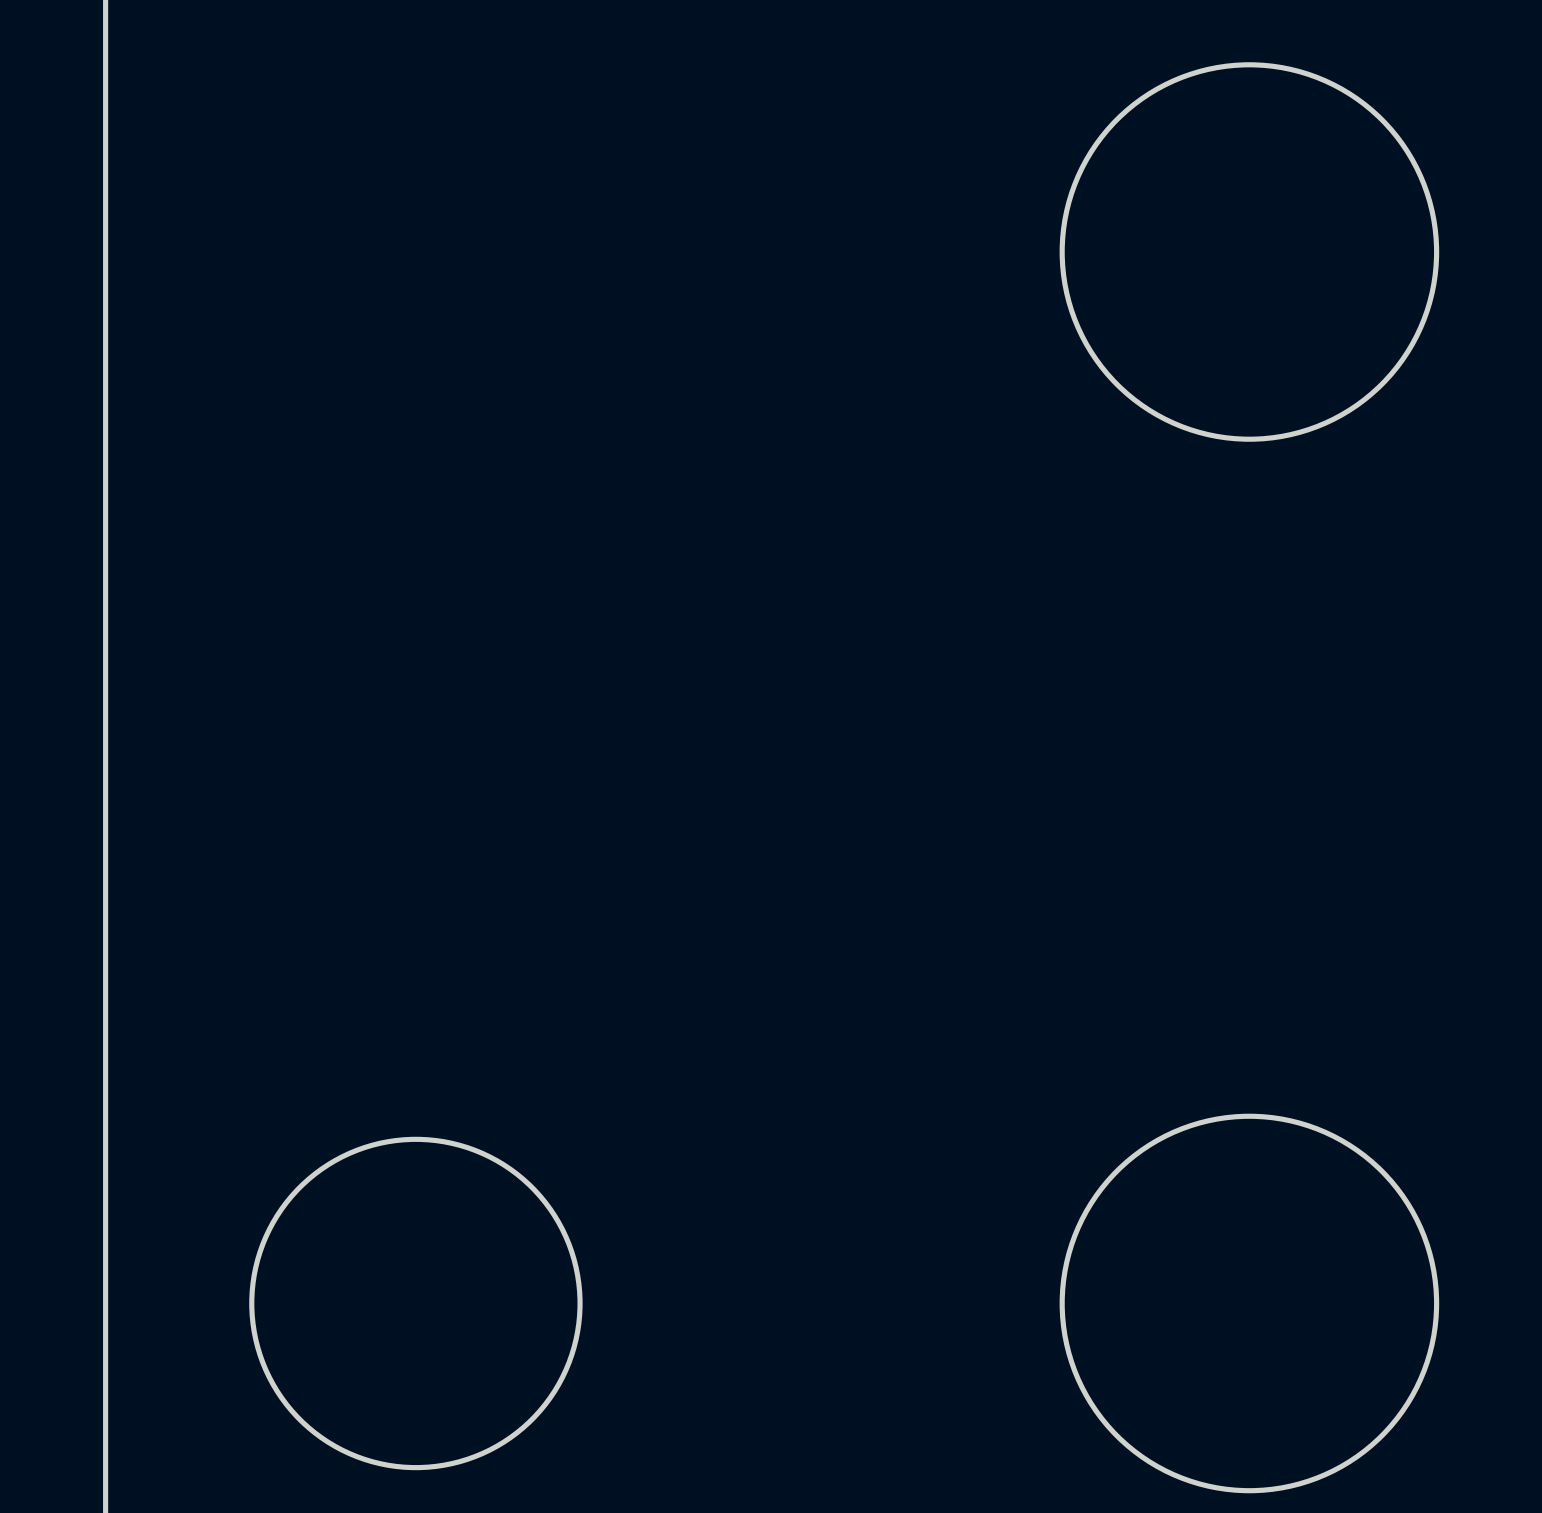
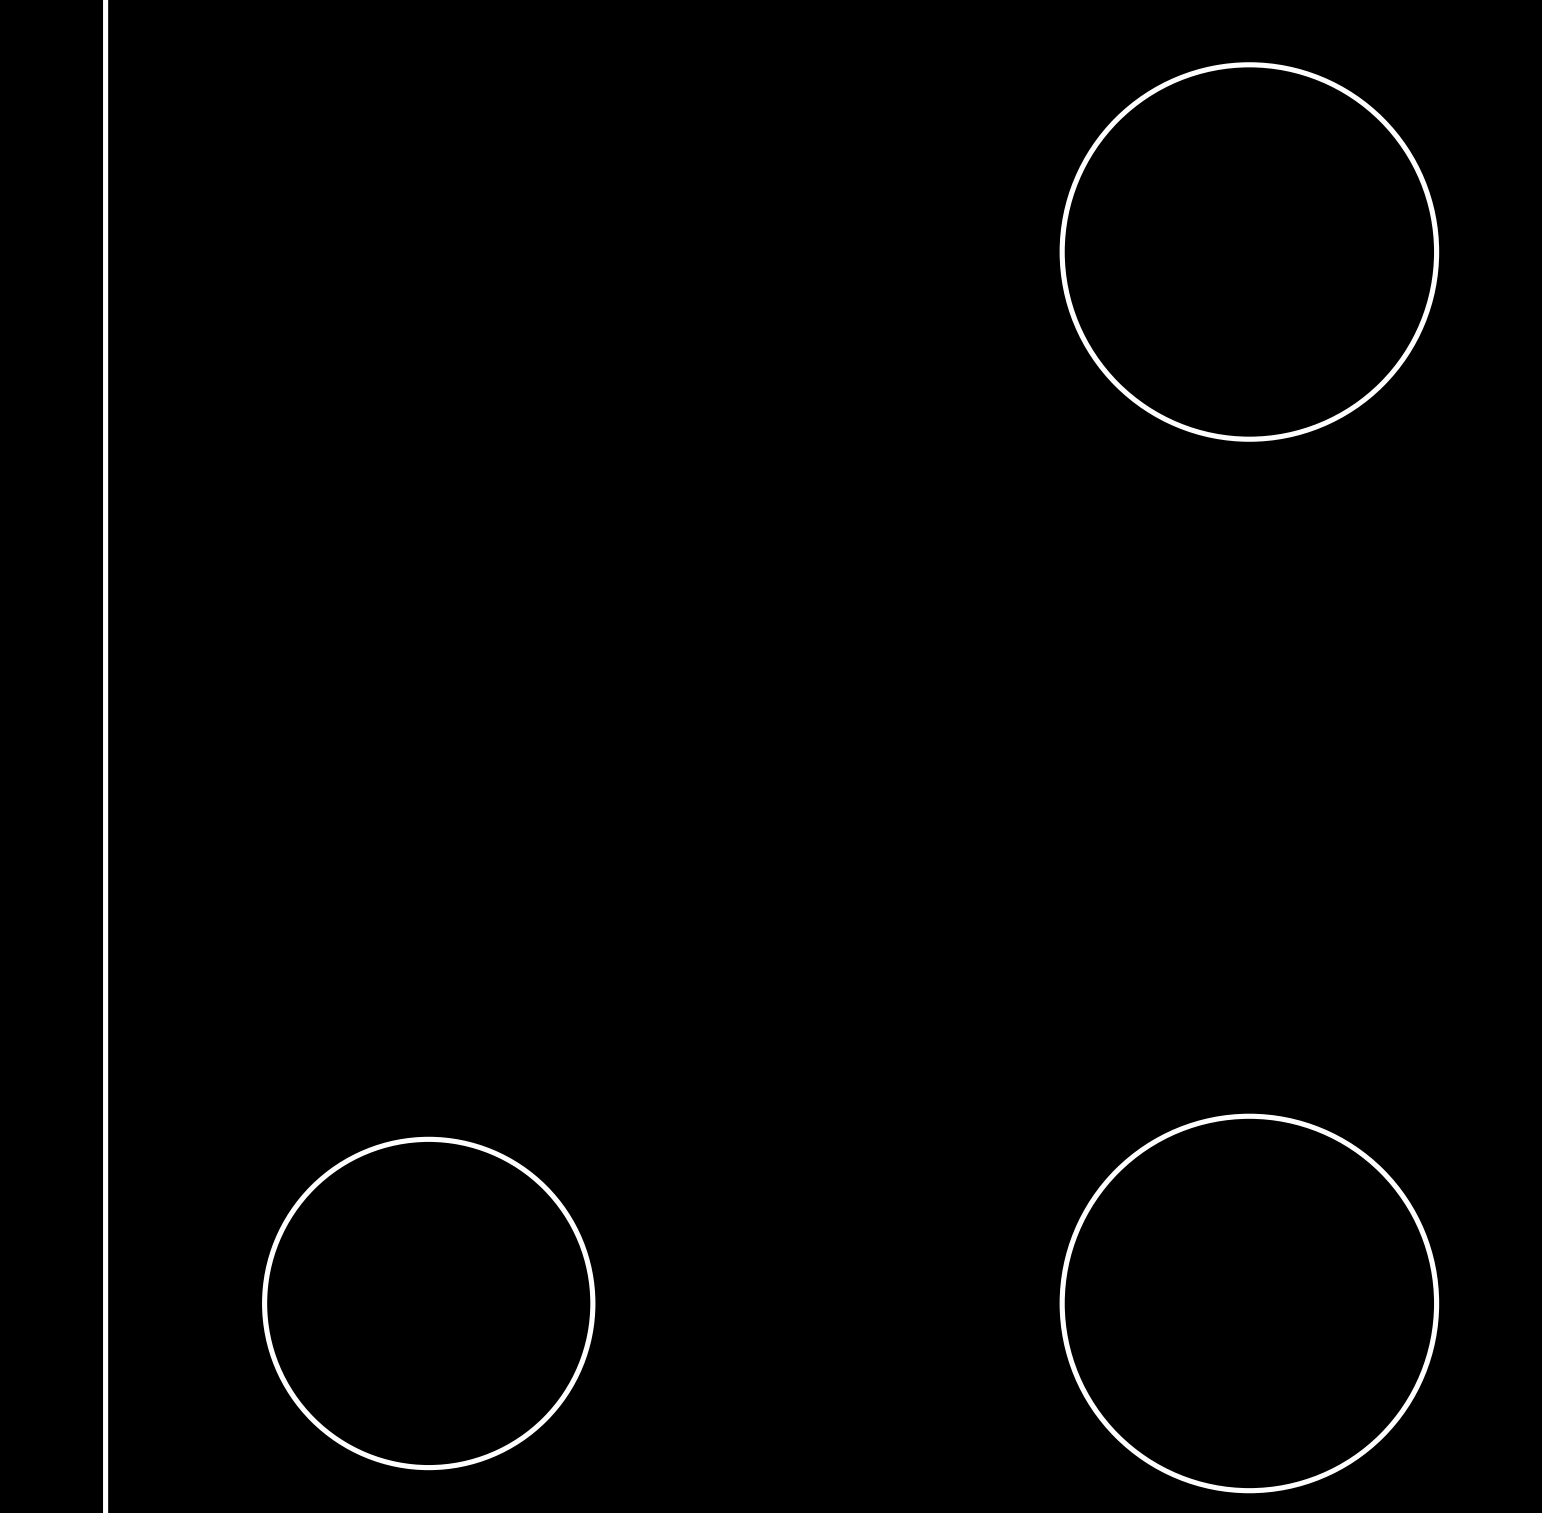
round board edge position: (415, 1303) -> (428, 1303)

